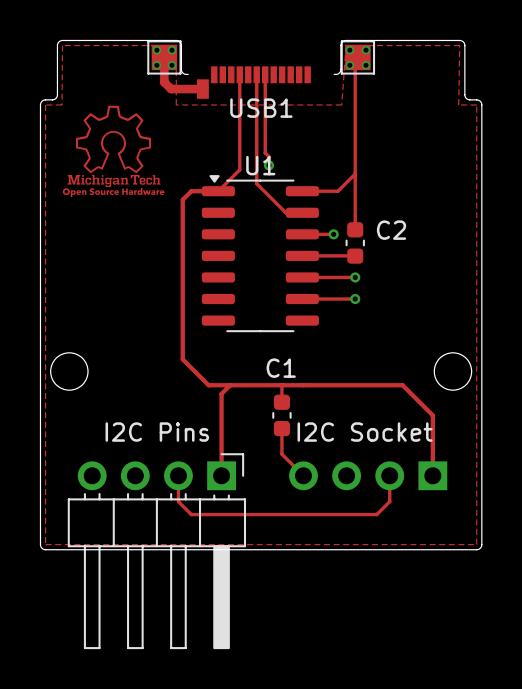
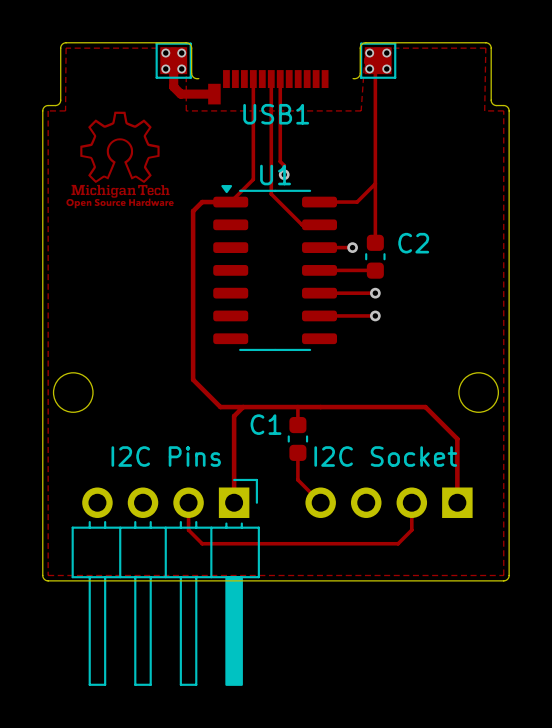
C1 name position: C1 (281, 368) -> C1 (266, 424)

